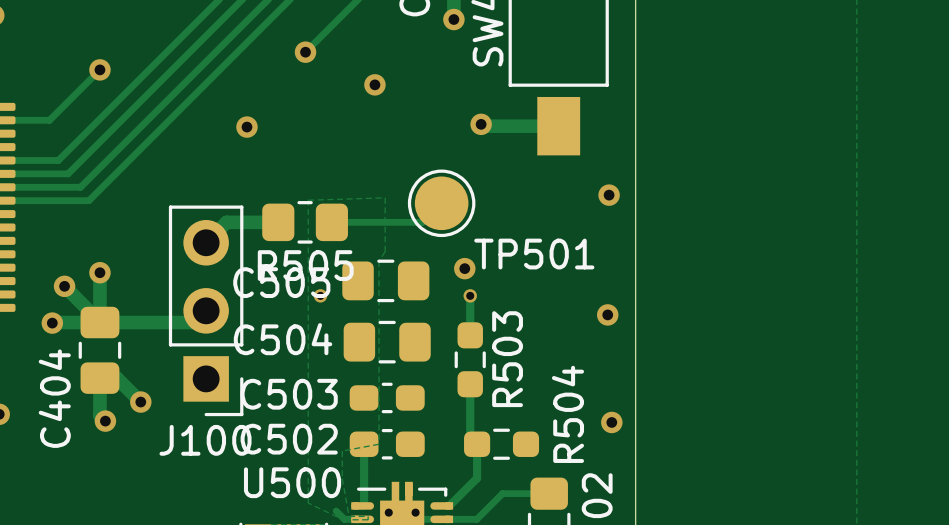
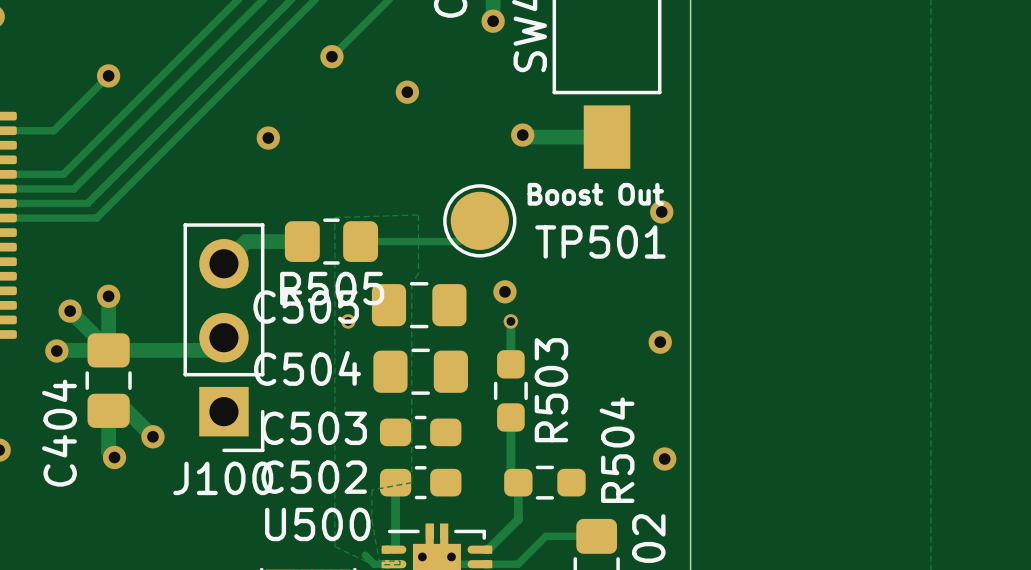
text: none -> Boost Out (595, 194)
TP501 name position: TP501 (534, 254) -> TP501 (600, 241)

